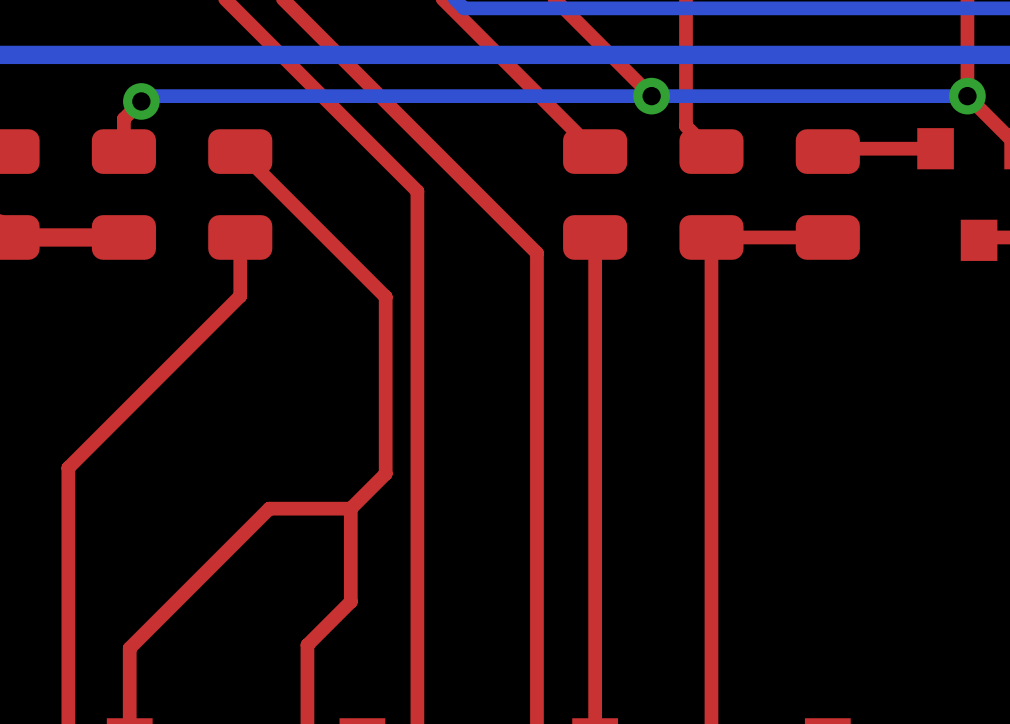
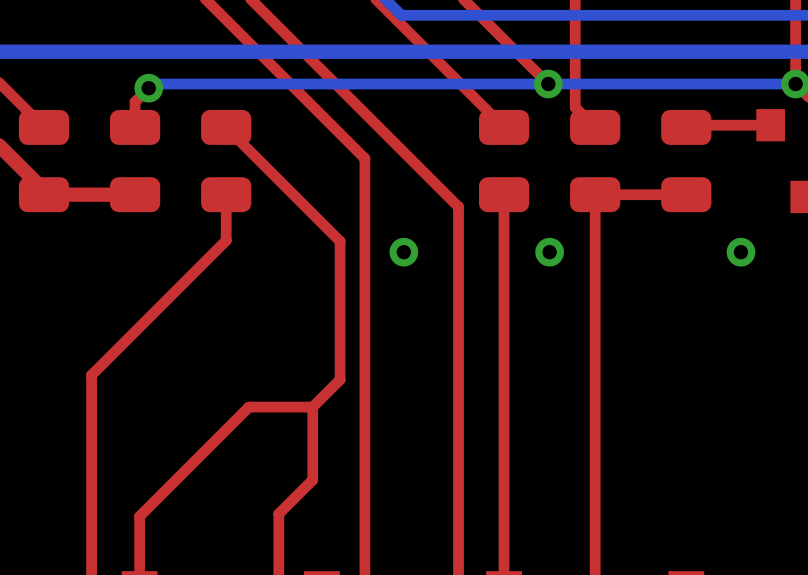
via: none -> (403, 252)
via: none -> (549, 252)
via: none -> (740, 252)

